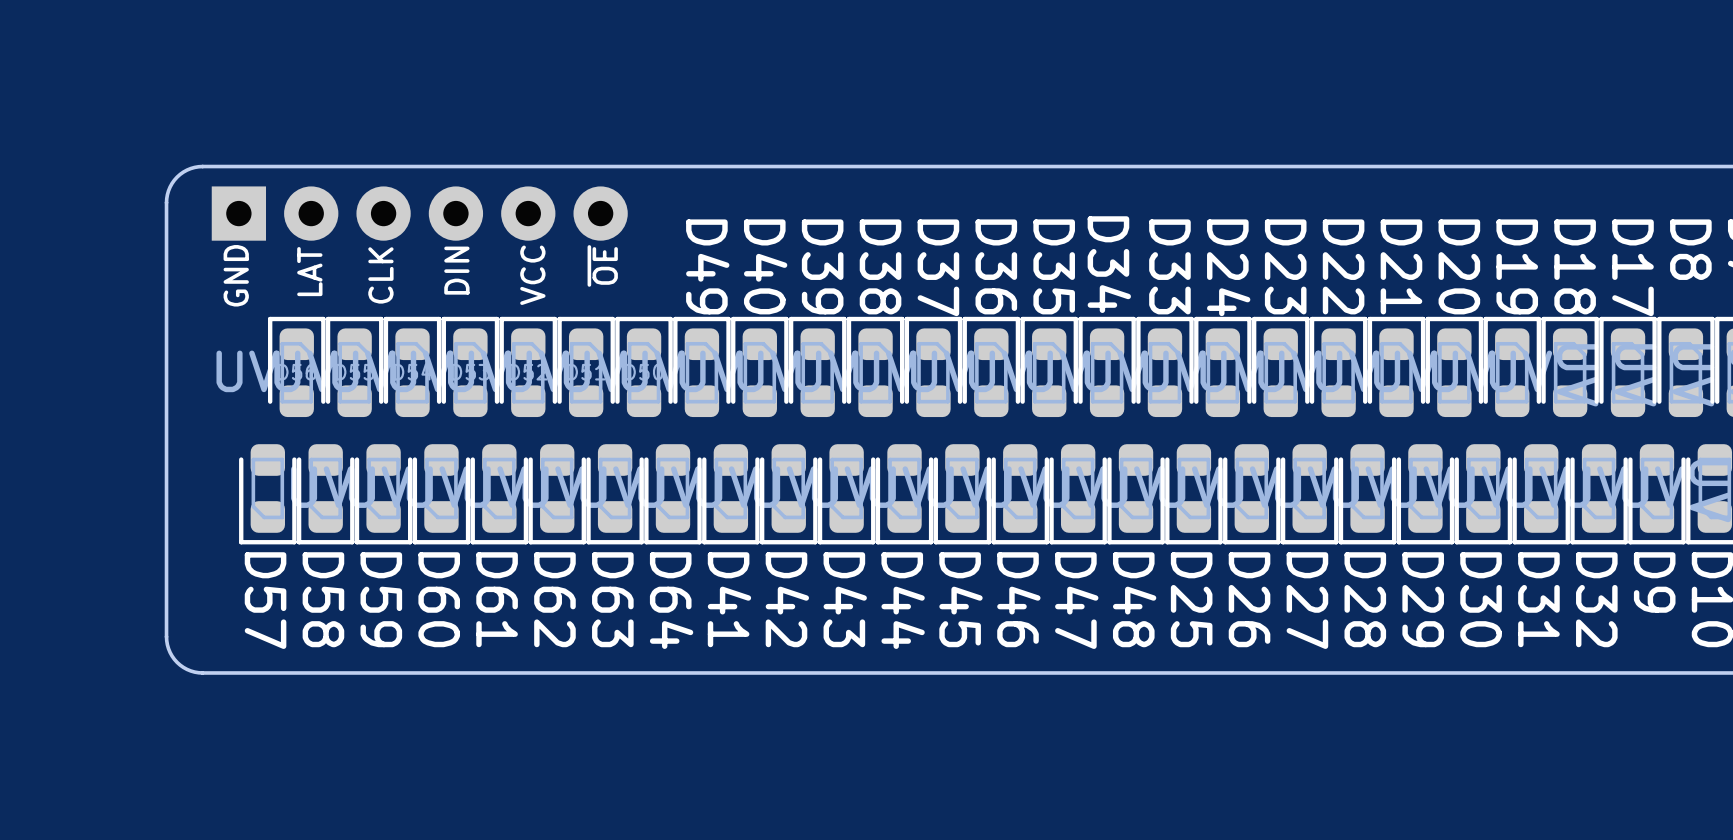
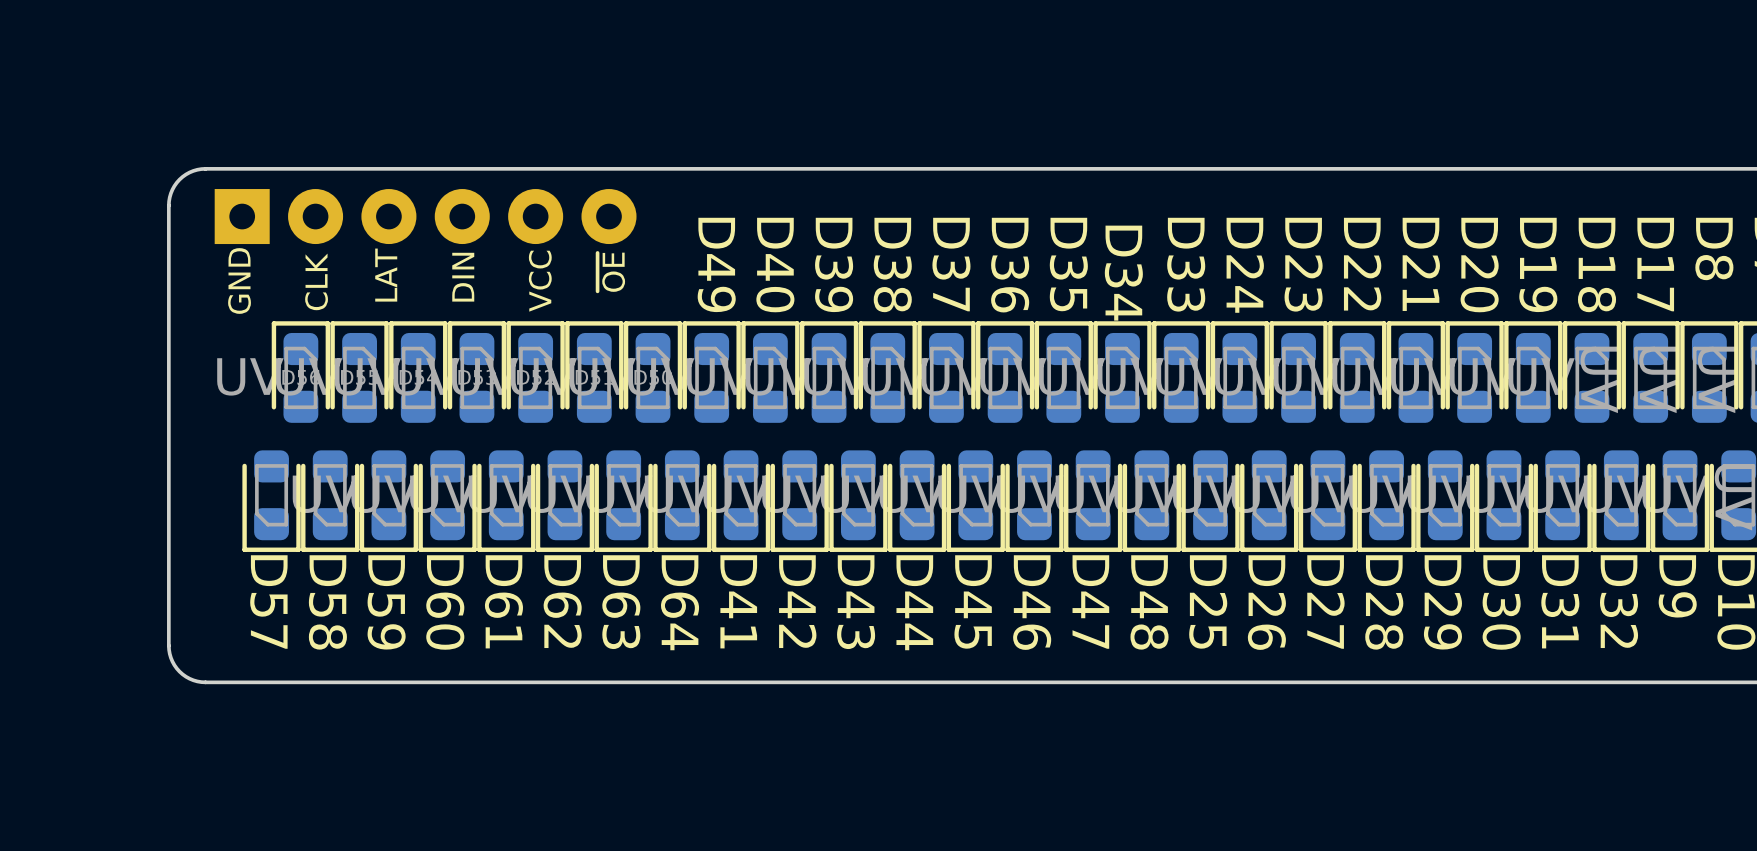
text position: LAT (309, 271) -> LAT (386, 275)
text position: CLK (380, 275) -> CLK (316, 281)

